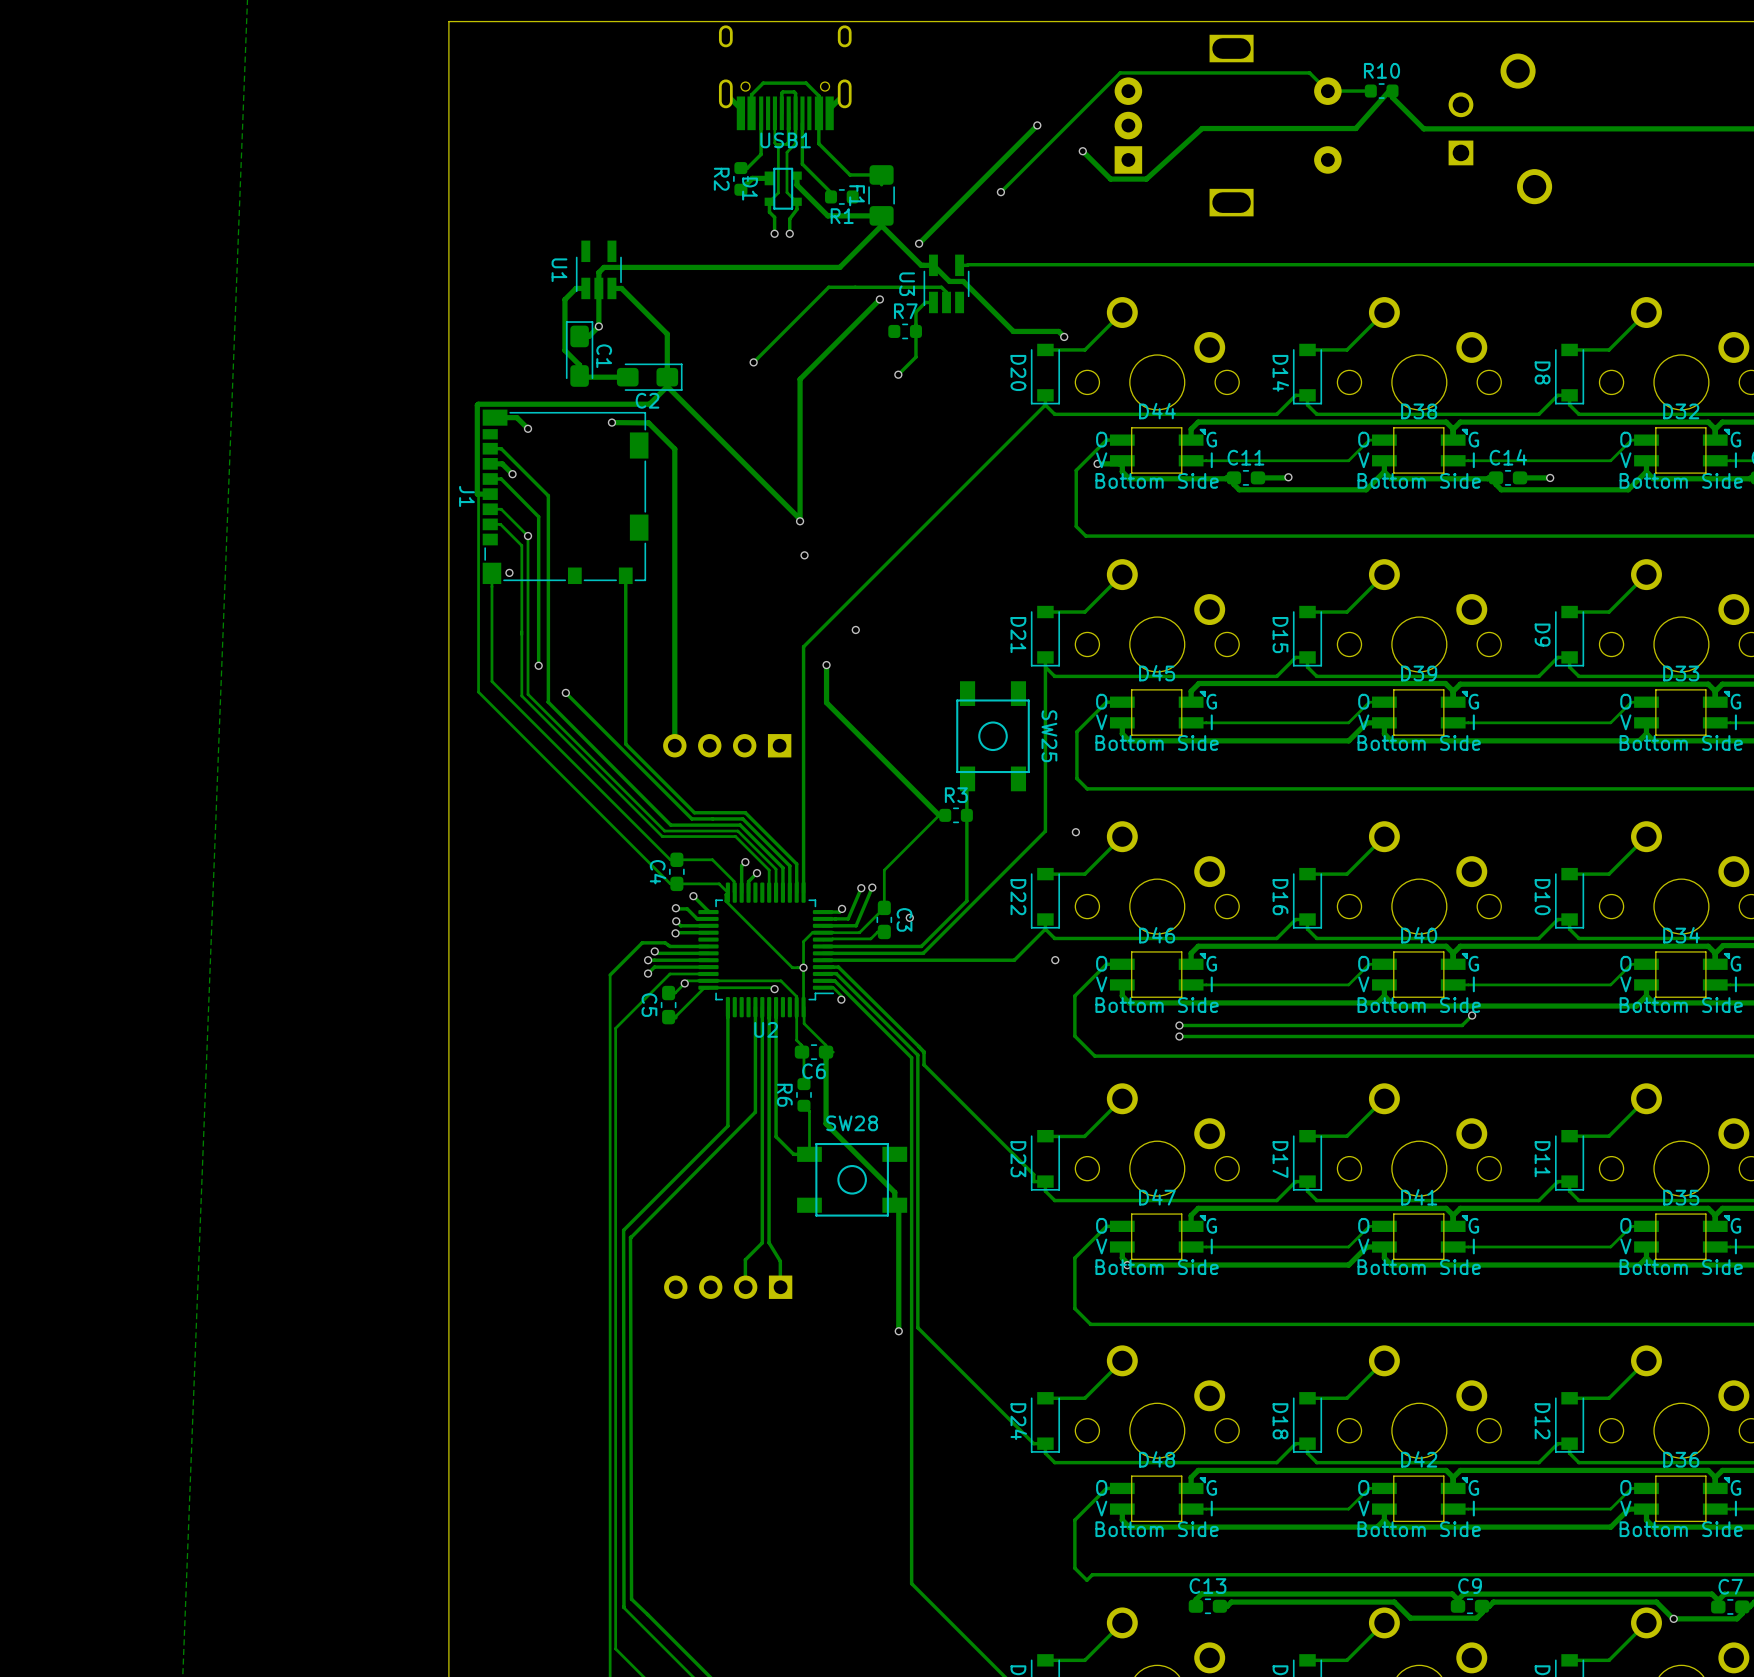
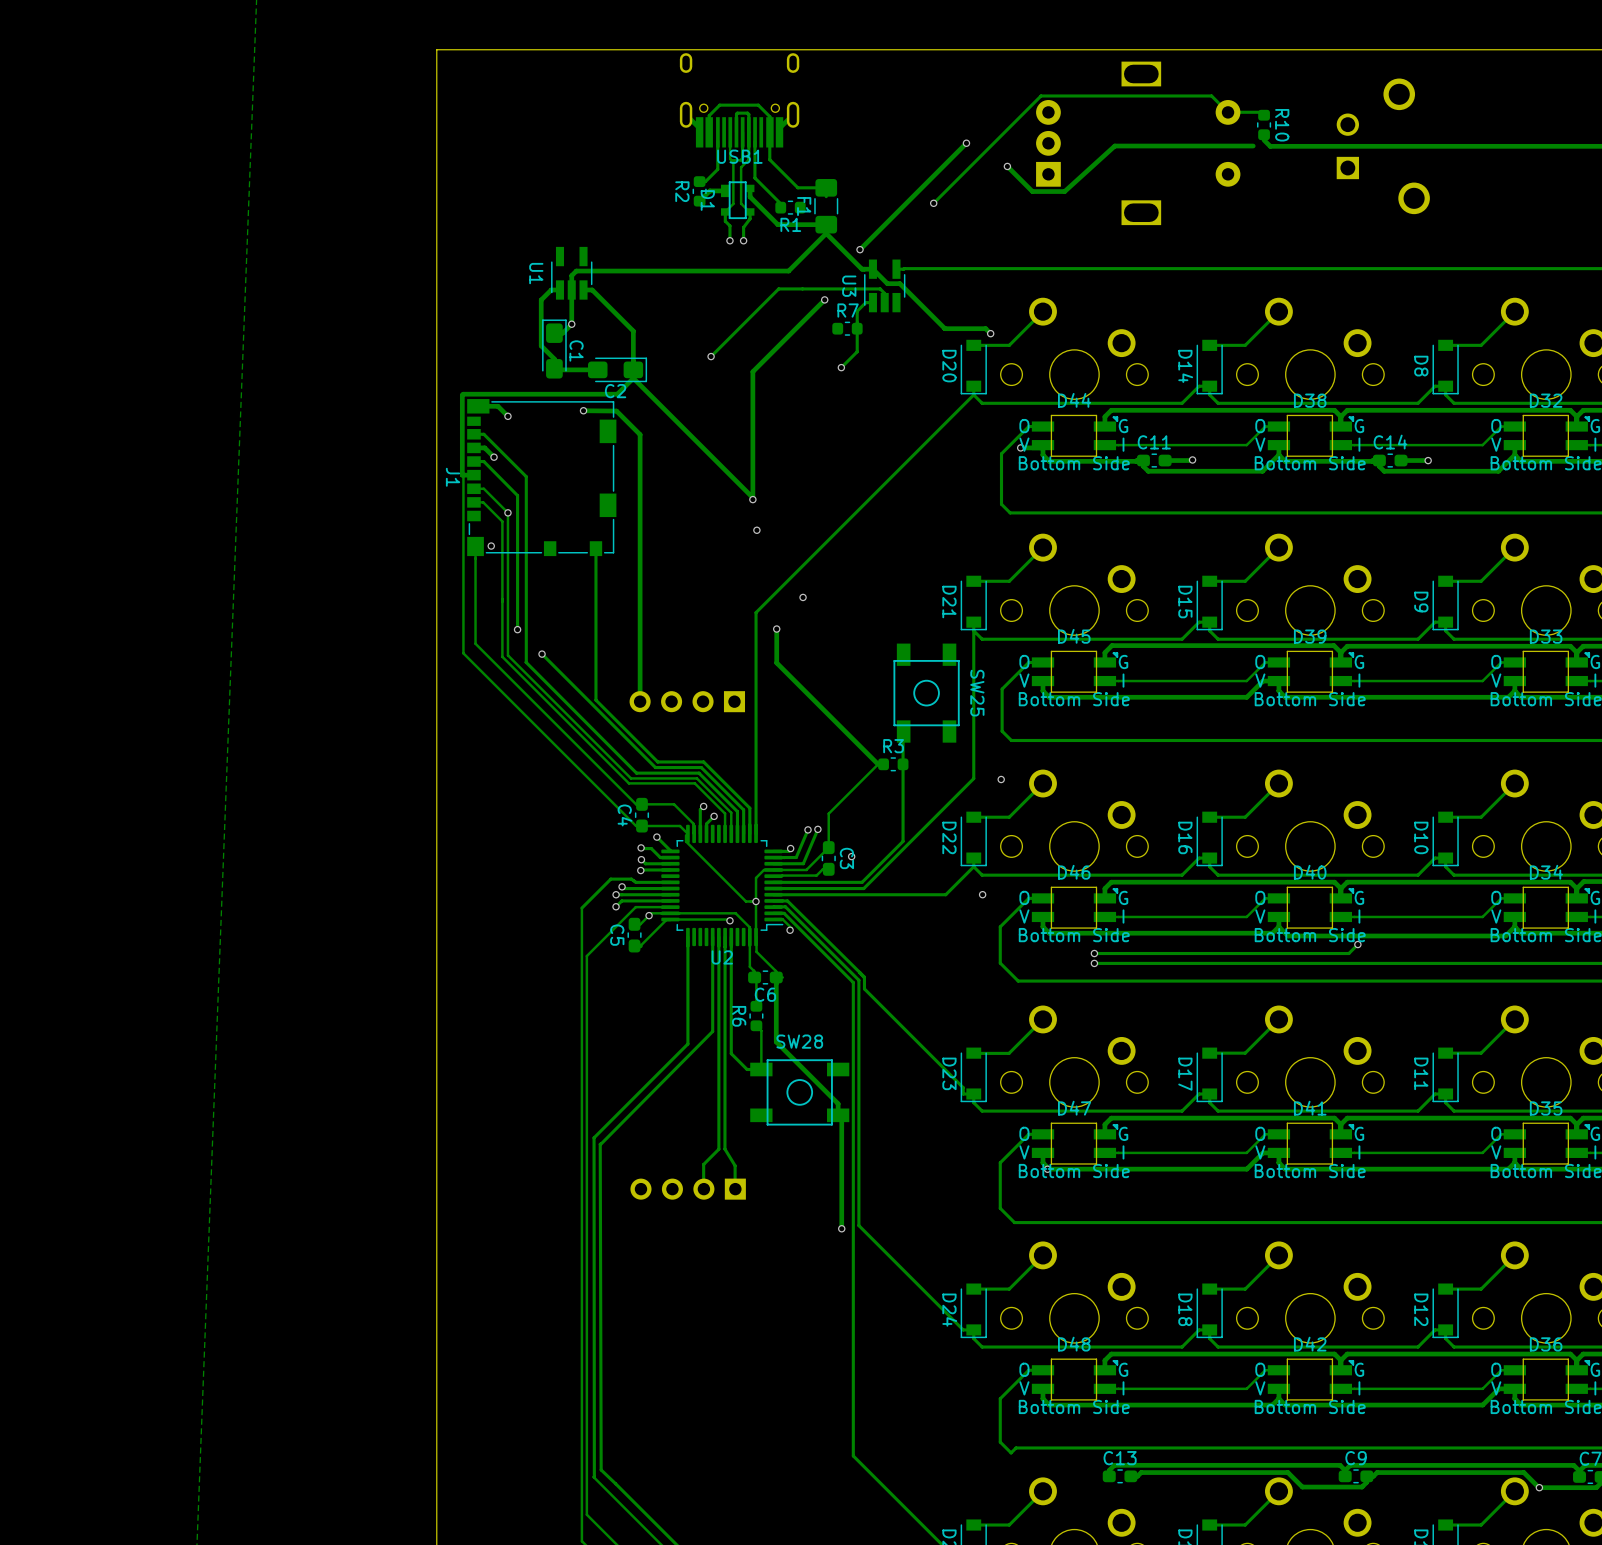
R10 rotation: 0° (1381, 91) -> 90° clockwise (1264, 124)
track: (1355, 128) (1389, 91) (1392, 91) (1392, 97) (1423, 128) -> (1264, 140) (1270, 146) (1314, 146)

